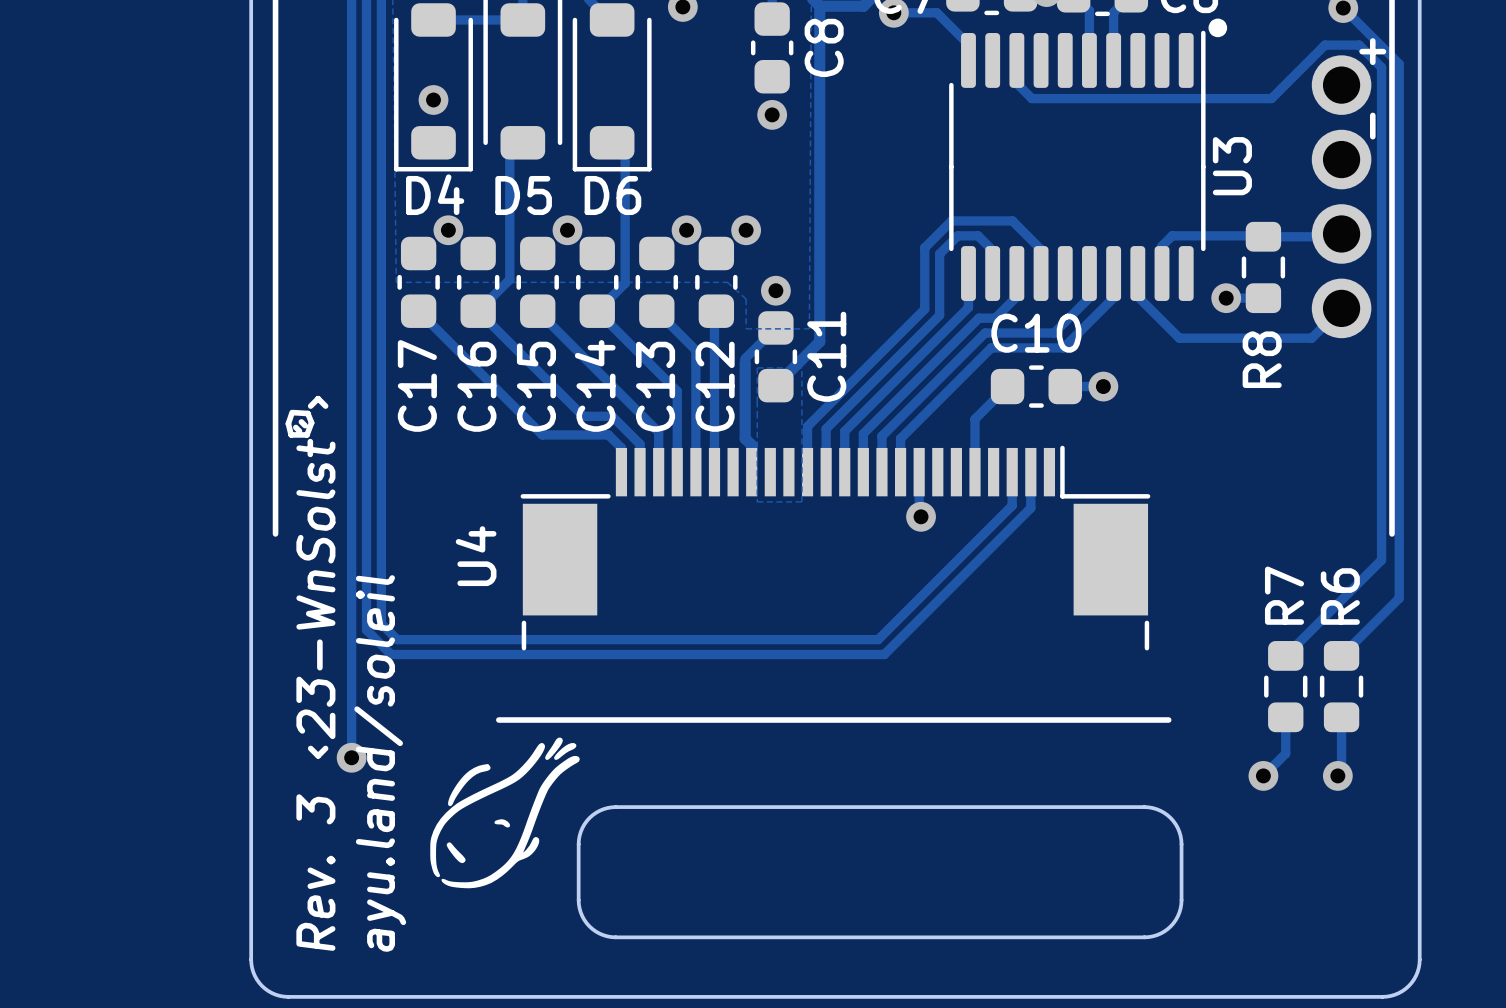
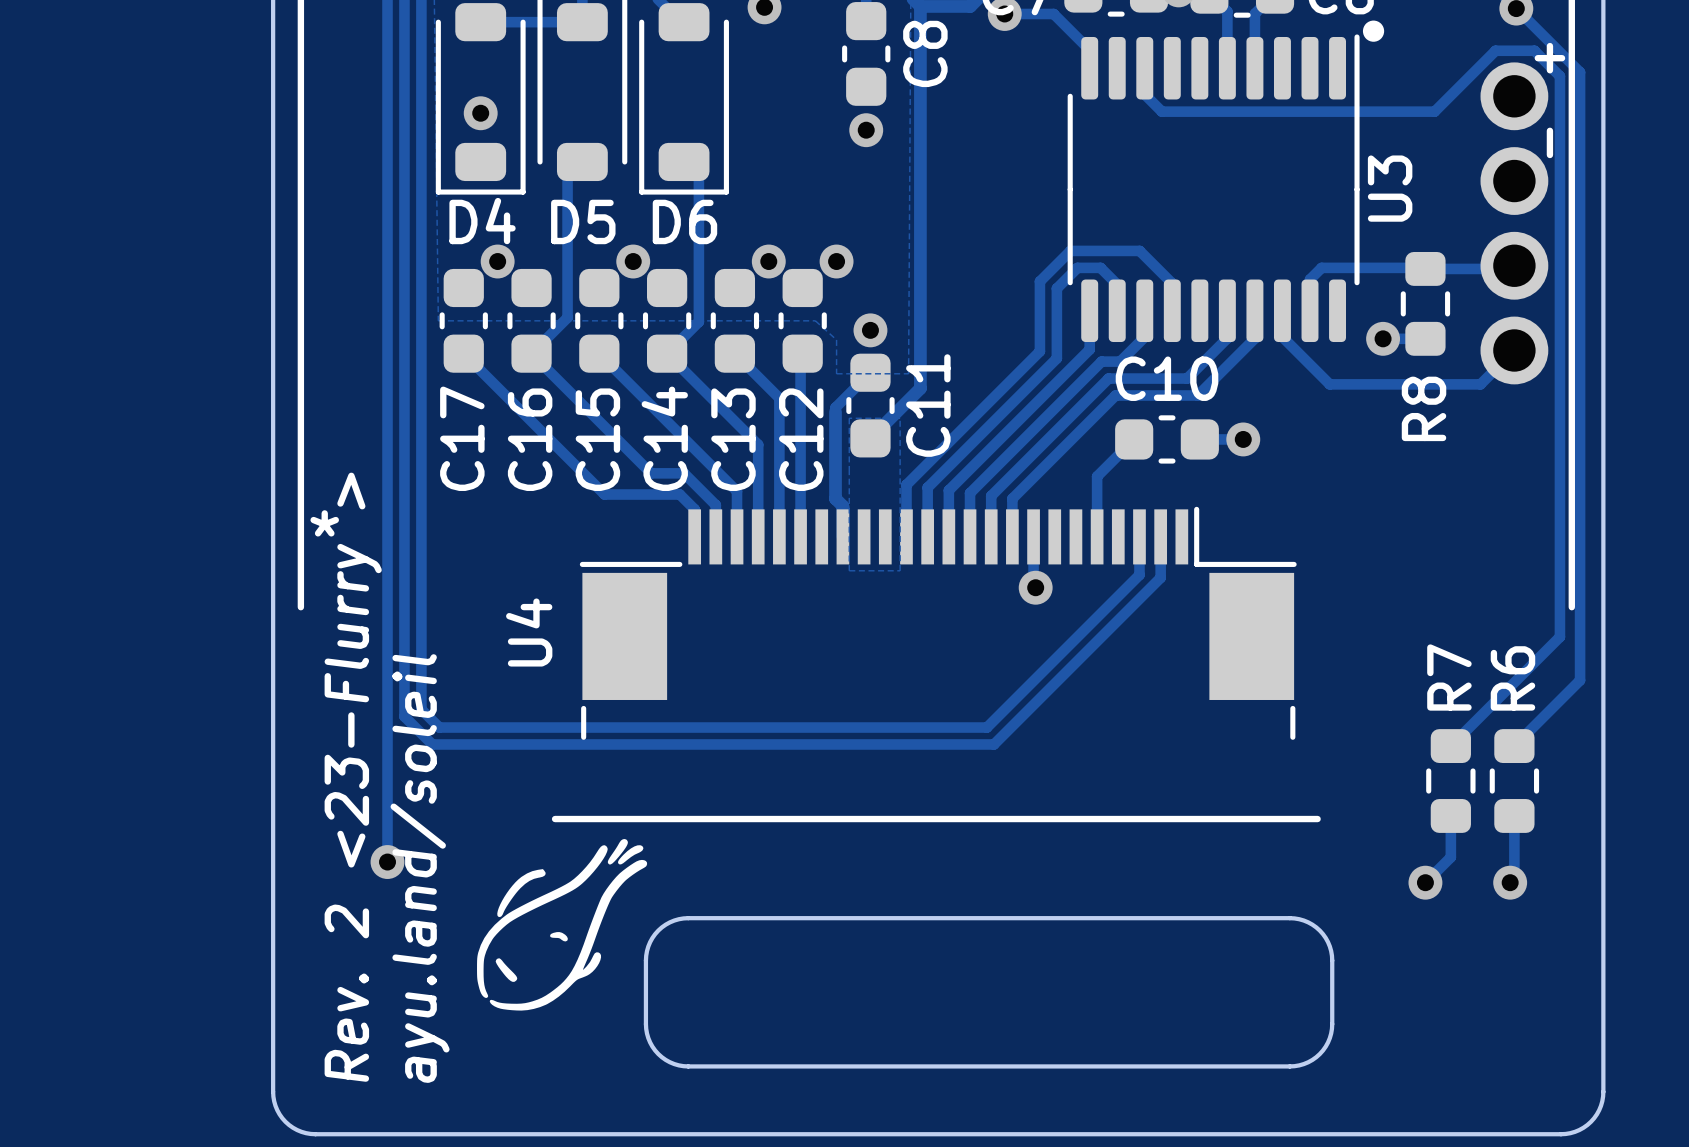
line: (310, 406) (318, 398) (325, 406) -> none
line: (292, 412) (288, 423) (291, 434) (306, 434) (311, 422) (307, 413) (293, 412) -> none
line: (301, 421) (305, 425) -> none
line: (295, 427) (299, 431) -> none
text: none -> * (324, 523)
text: 23-WnSolst (315, 588) -> none
line: (310, 748) (318, 755) (325, 748) -> none
text: Rev. 3 (315, 872) -> Rev. 2 <23-Flurry > (353, 777)

